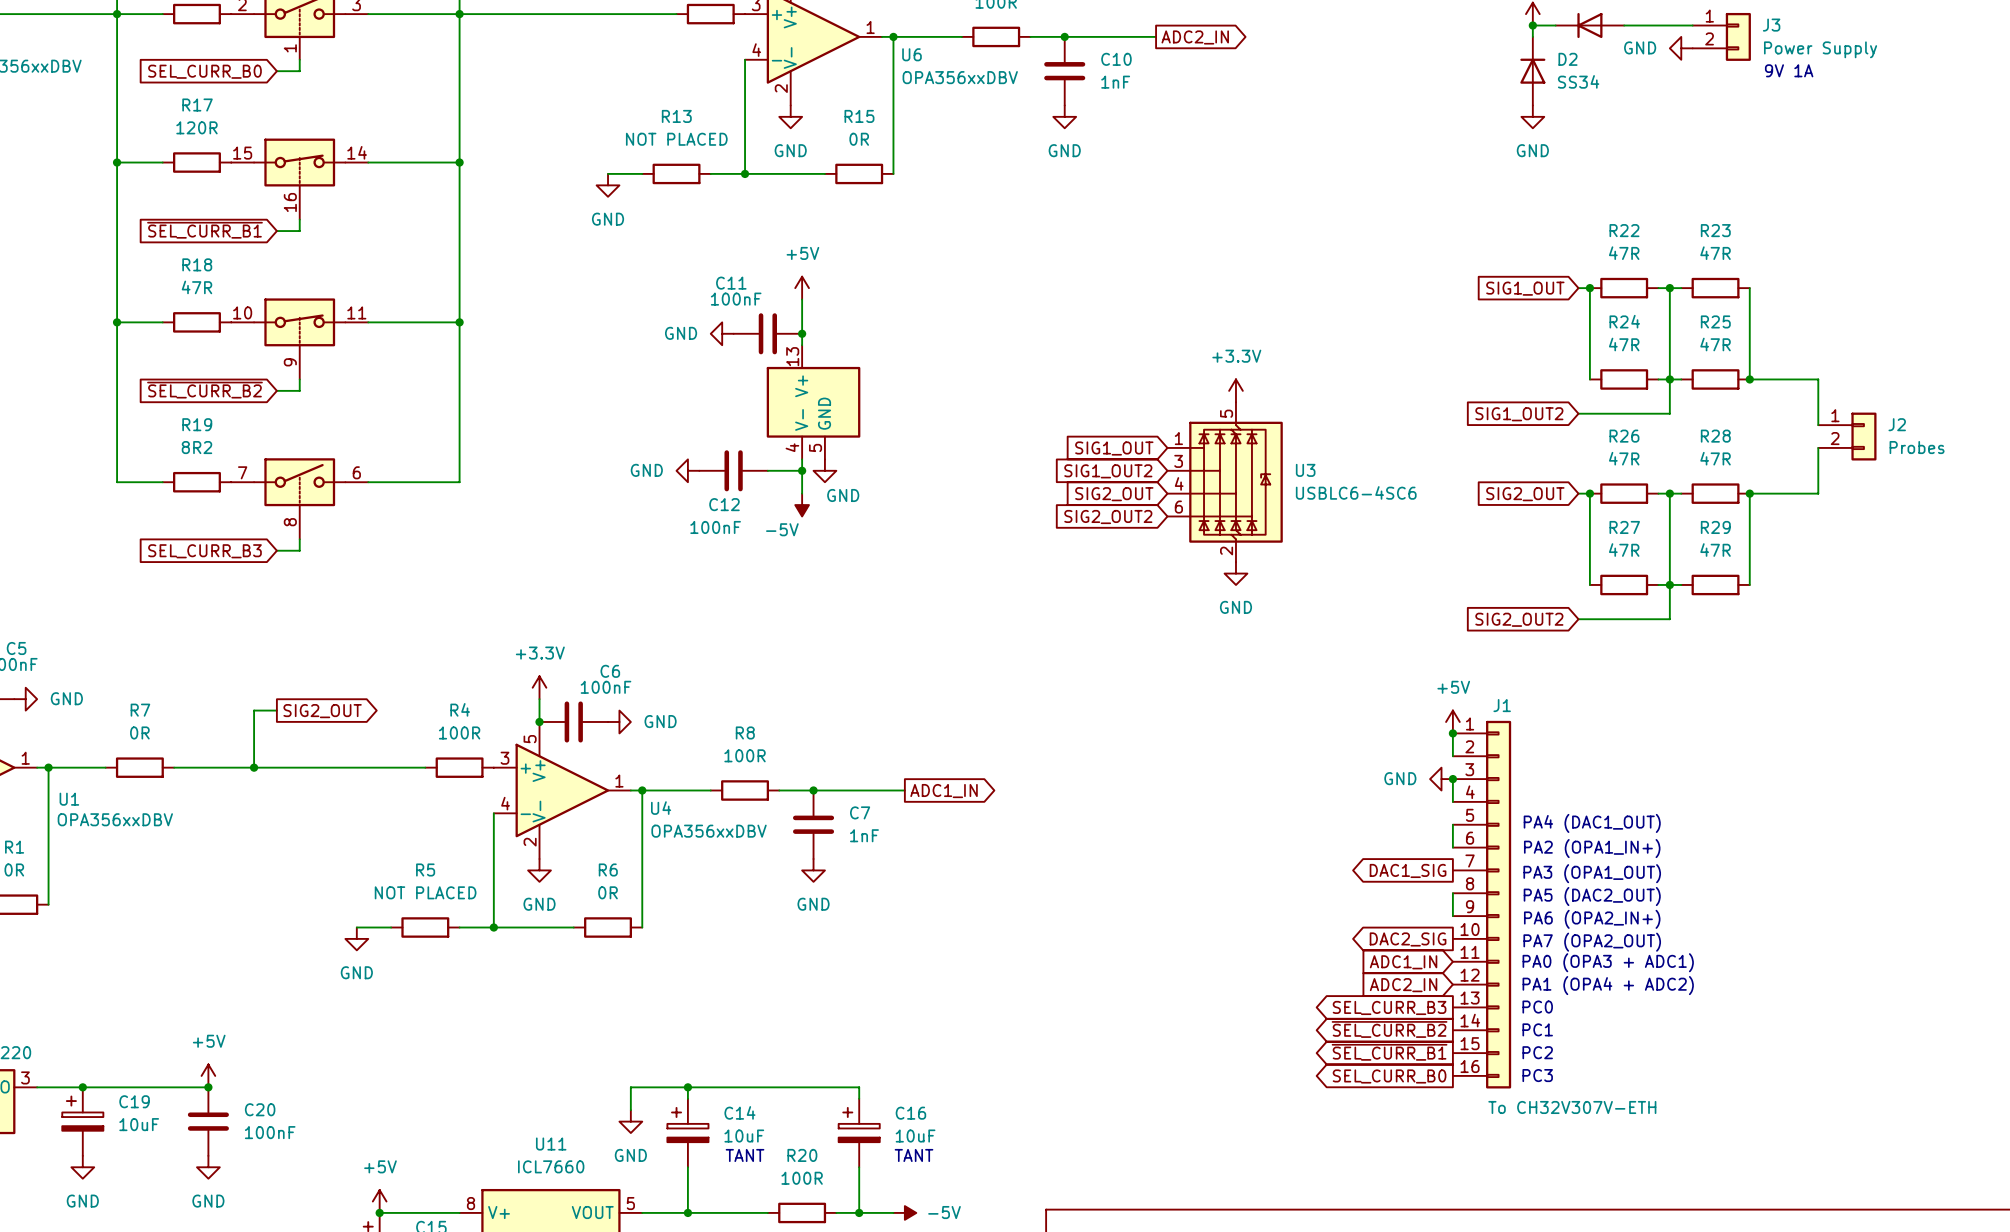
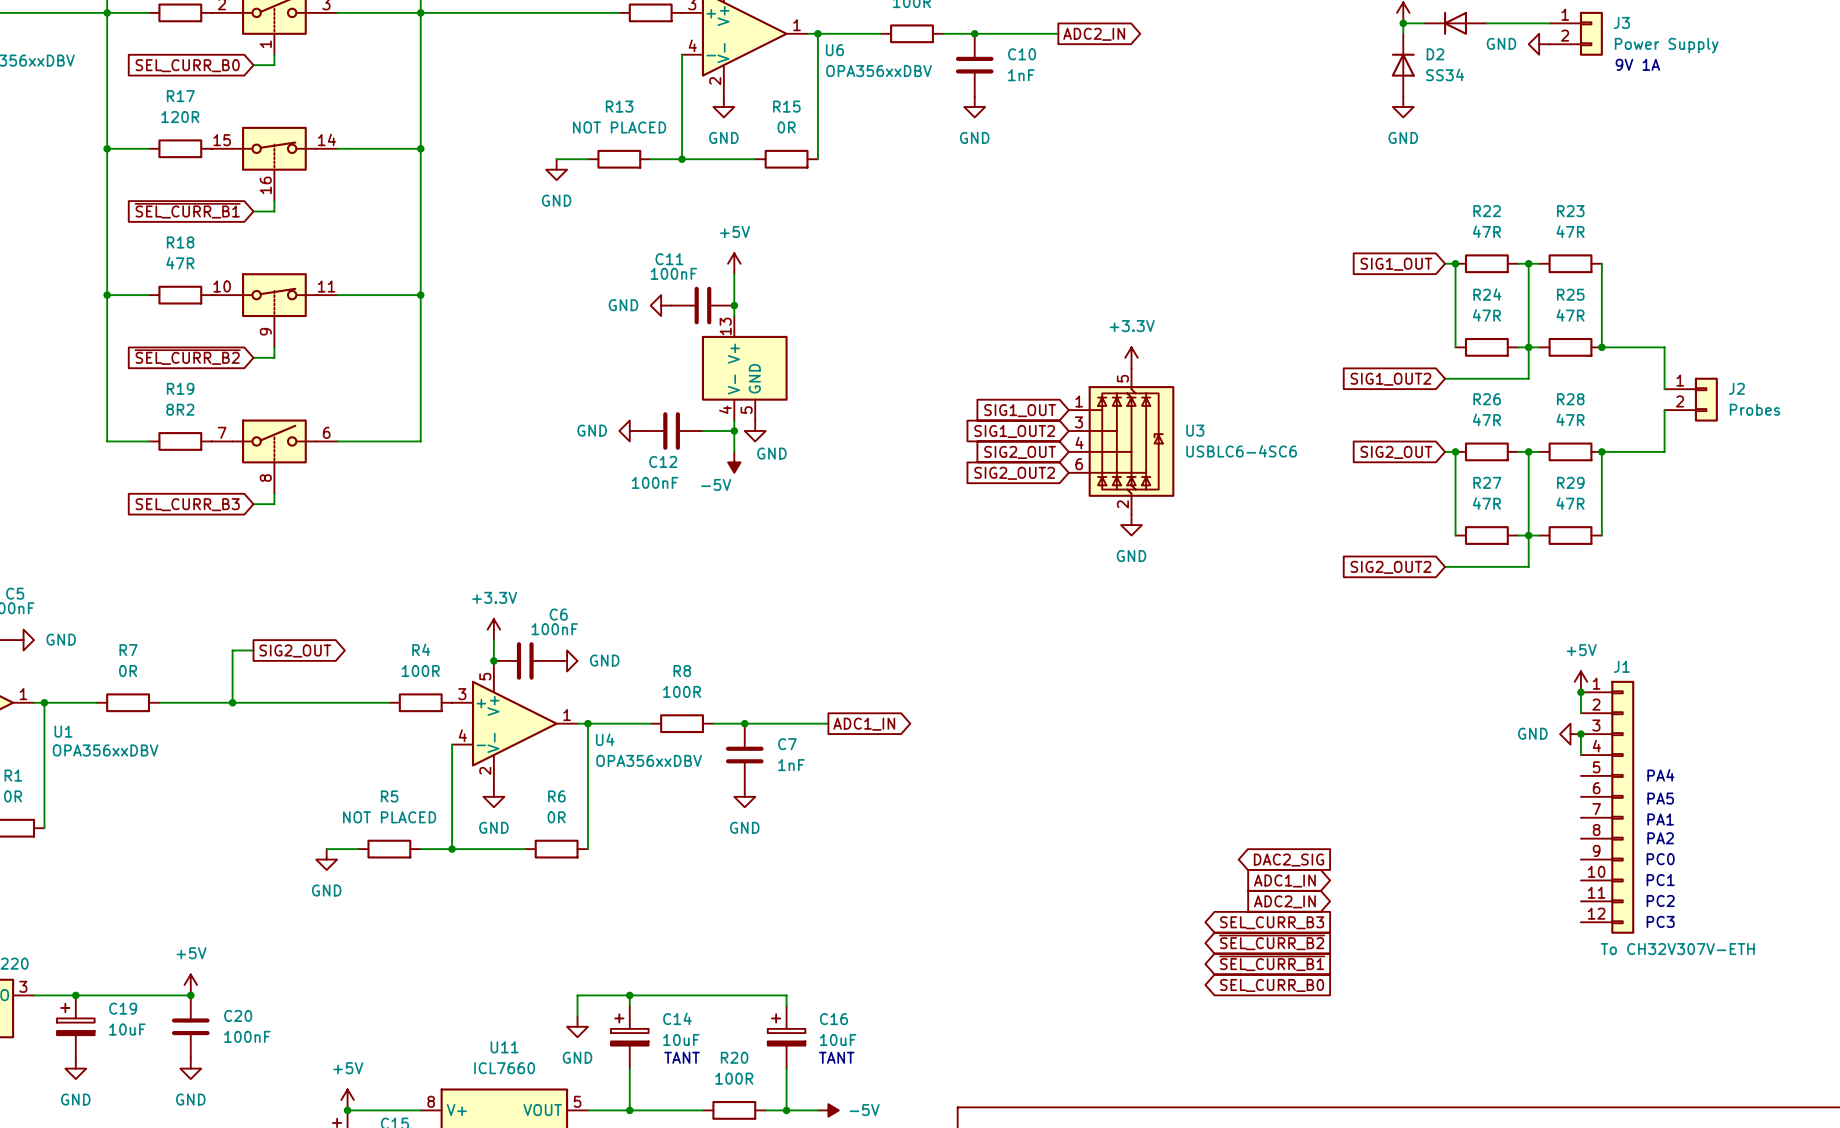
J1 name position: J1 (1502, 705) -> J1 (1621, 666)
J1 symbol: [1452, 720, 1512, 1089] -> [1580, 680, 1635, 934]
power symbol: +5V (1452, 721) -> none
wire: (1452, 733) (1452, 756) -> none
junction: (1452, 733) -> none
power symbol: none -> +5V (1580, 681)
wire: none -> (1580, 692) (1580, 713)
junction: none -> (1580, 692)
power symbol: GND (1441, 779) -> none
wire: (1452, 779) (1452, 801) -> none
junction: (1452, 779) -> none
power symbol: none -> GND (1570, 734)
wire: none -> (1580, 734) (1580, 755)
junction: none -> (1580, 734)
text: PA4 (DAC1_OUT) (1592, 823) -> none
wire: (1452, 824) (1452, 847) -> none
text: none -> PA4 (1660, 775)
text: PA2 (OPA1_IN+) (1592, 848) -> none
global label: DAC1_SIG (1408, 870) -> none
text: none -> PA5 (1660, 798)
text: PA3 (OPA1_OUT) (1592, 873) -> none
wire: (1452, 893) (1452, 916) -> none
text: none -> PA1 (1660, 819)
text: PA5 (DAC2_OUT) (1592, 896) -> none
text: none -> PA2 (1660, 838)
text: PA6 (OPA2_IN+) (1592, 919) -> none
text: none -> PC0 (1660, 859)
text: PA7 (OPA2_OUT) (1592, 942) -> none
text: none -> PC1 (1660, 880)
text: PA0 (OPA3 + ADC1) (1608, 962) -> none
text: none -> PC2 (1660, 901)
text: PA1 (OPA4 + ADC2) (1608, 985) -> none
text: PC0 (1537, 1007) -> none
text: none -> PC3 (1660, 921)
text: PC1 (1537, 1029) -> none
text: PC2 (1537, 1052) -> none
text: PC3 (1537, 1075) -> none
J1 value position: To CH32V307V-ETH (1572, 1107) -> To CH32V307V-ETH (1677, 949)

